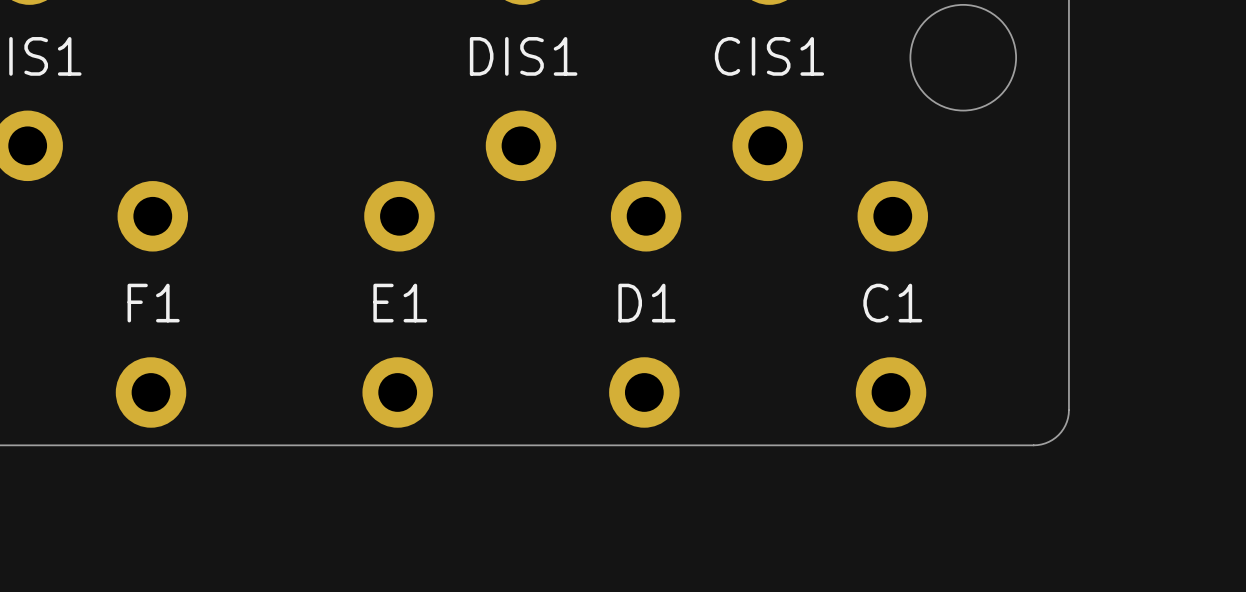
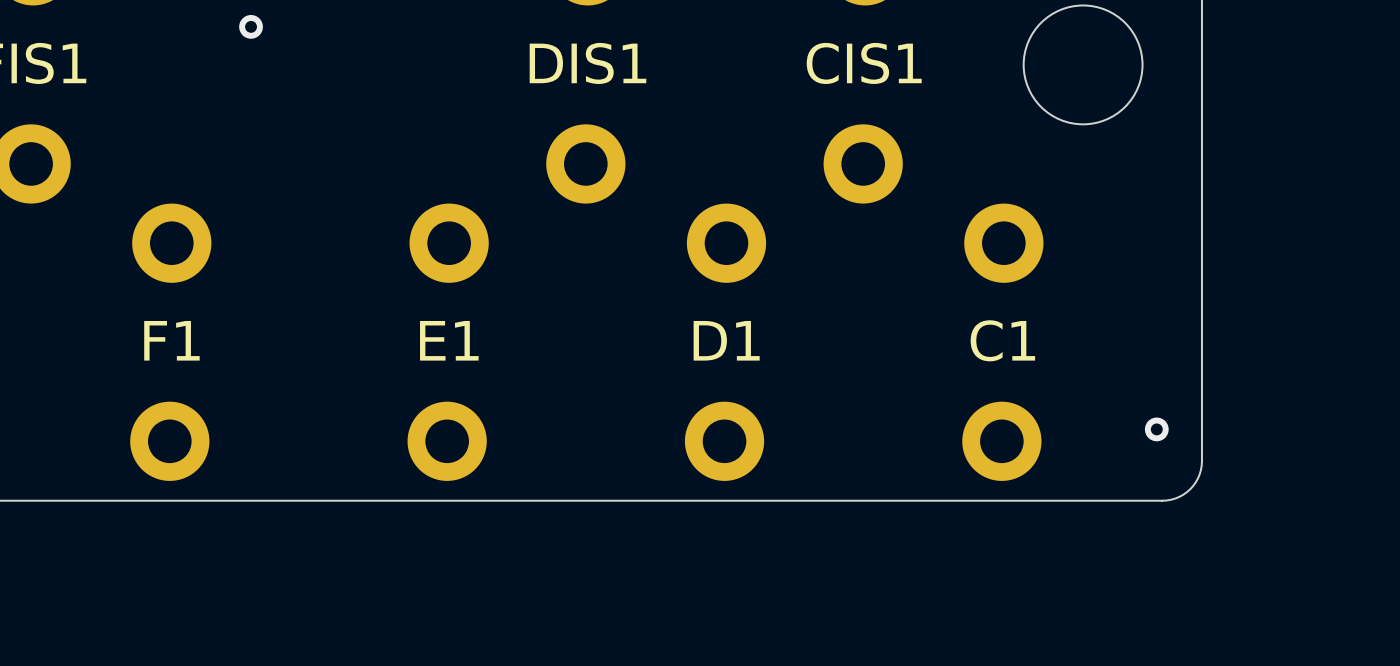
via: none -> (251, 26)
via: none -> (1156, 429)

